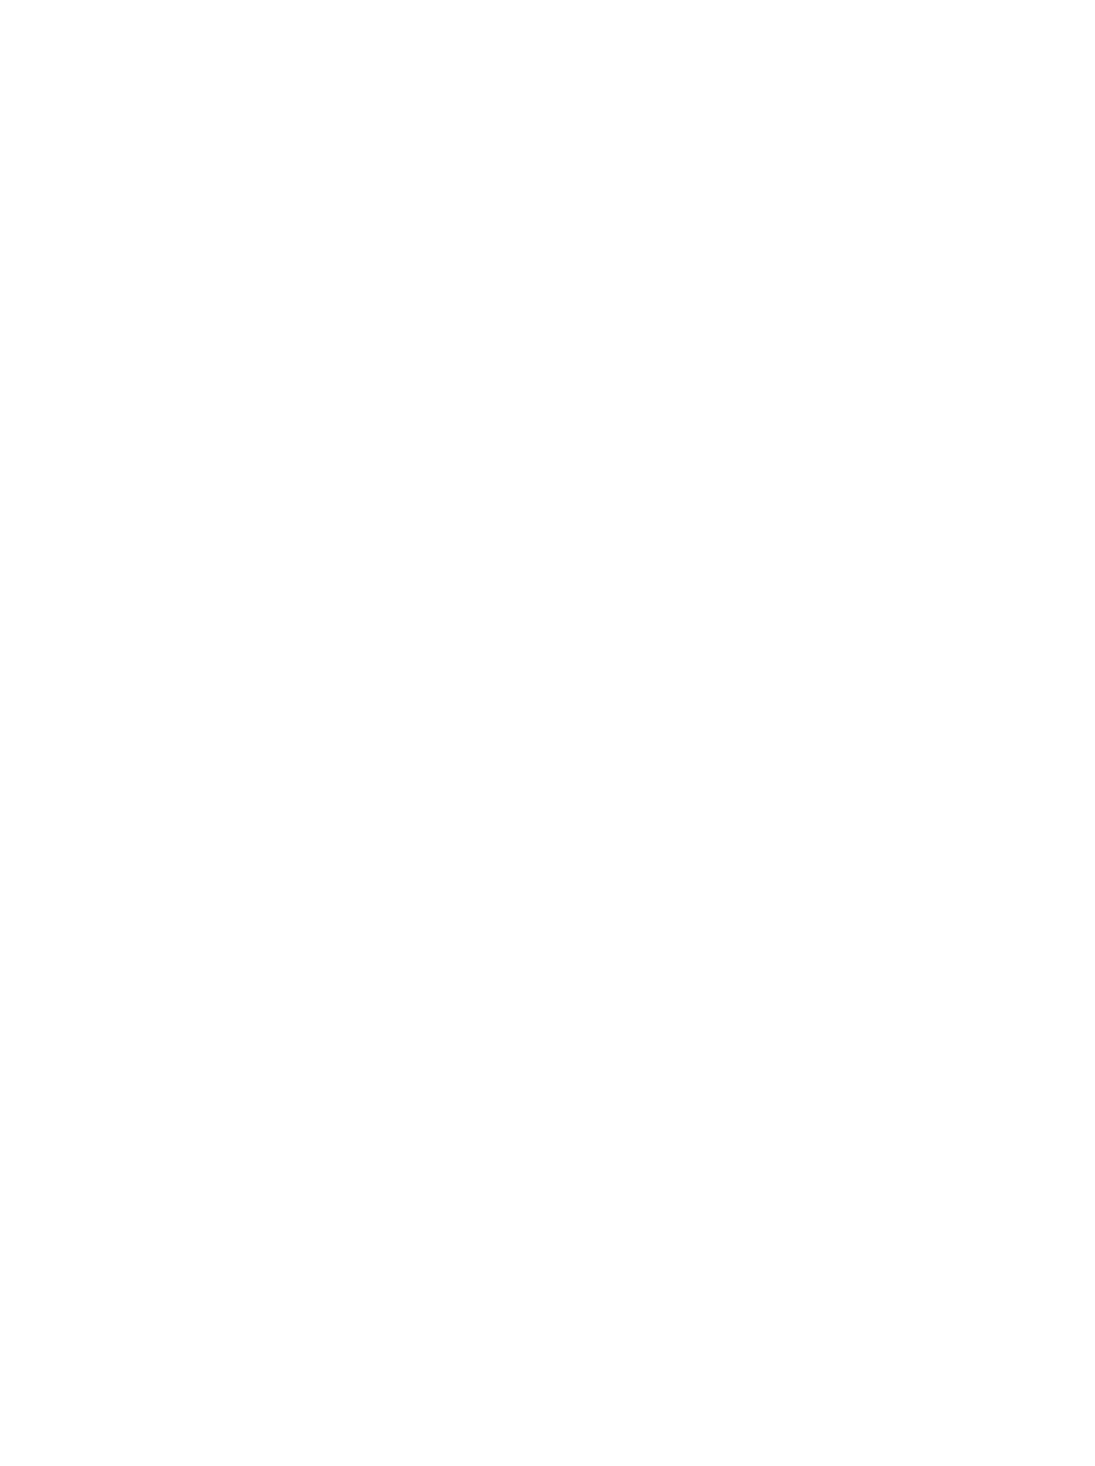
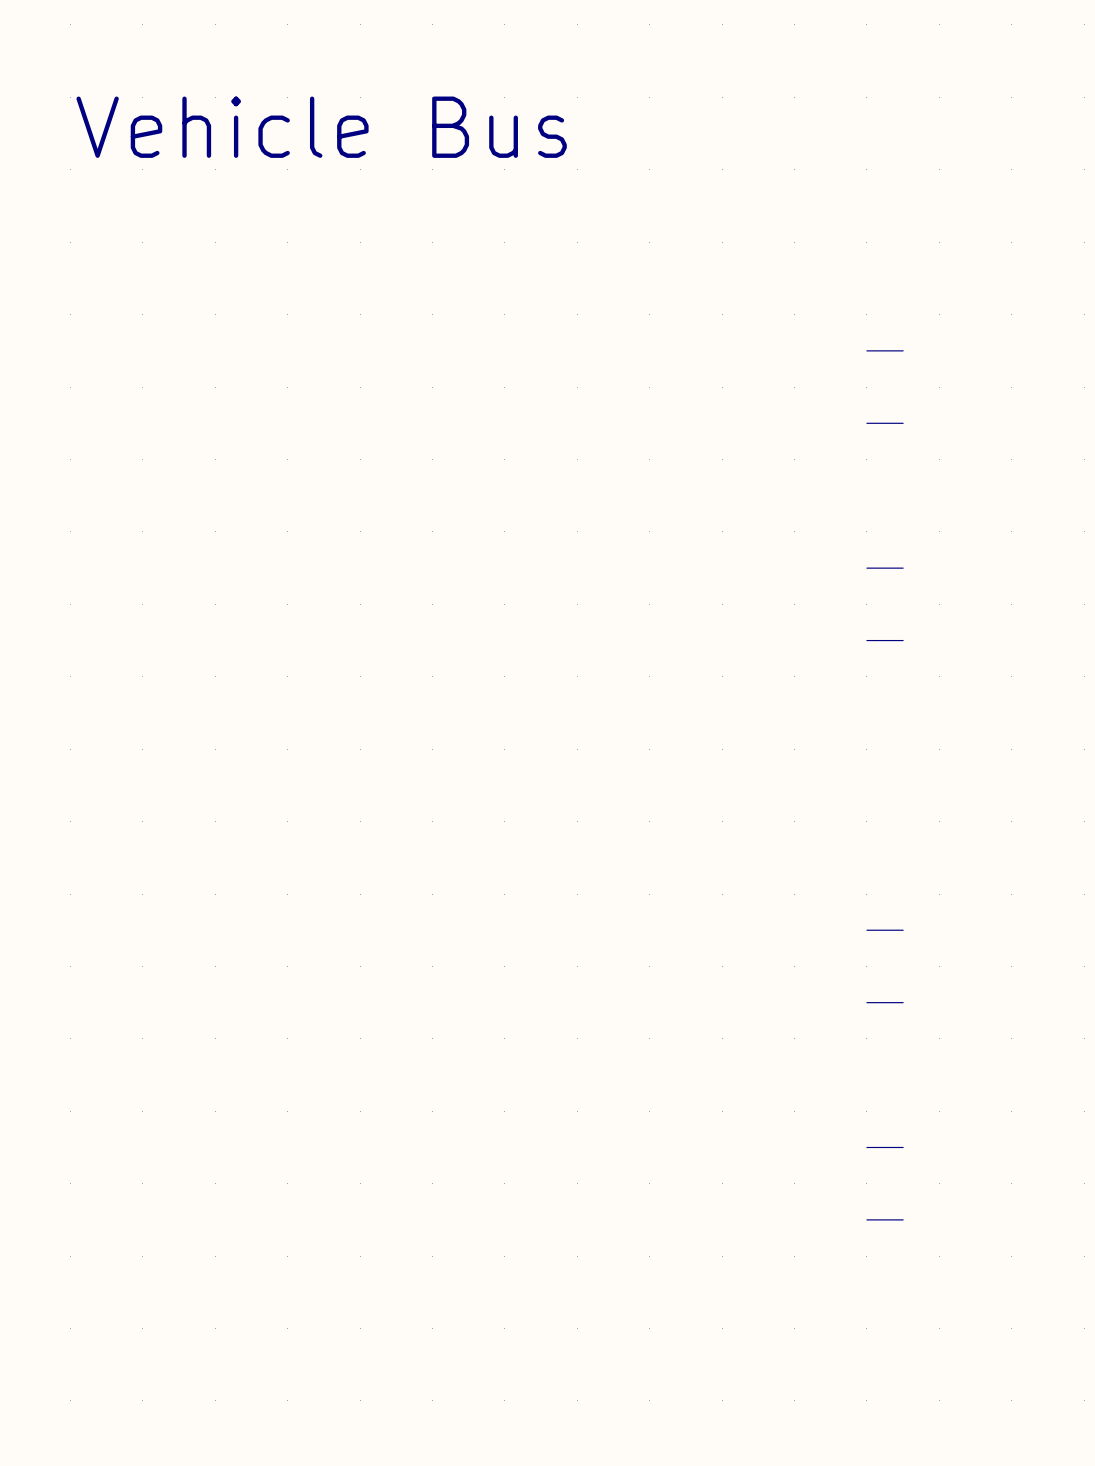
text: none -> Vehicle Bus (321, 127)
wire: none -> (866, 350) (903, 350)
wire: none -> (866, 423) (903, 423)
wire: none -> (866, 568) (903, 568)
wire: none -> (866, 640) (903, 640)
wire: none -> (866, 930) (903, 930)
wire: none -> (866, 1002) (903, 1002)
wire: none -> (866, 1147) (903, 1147)
wire: none -> (866, 1219) (903, 1219)

